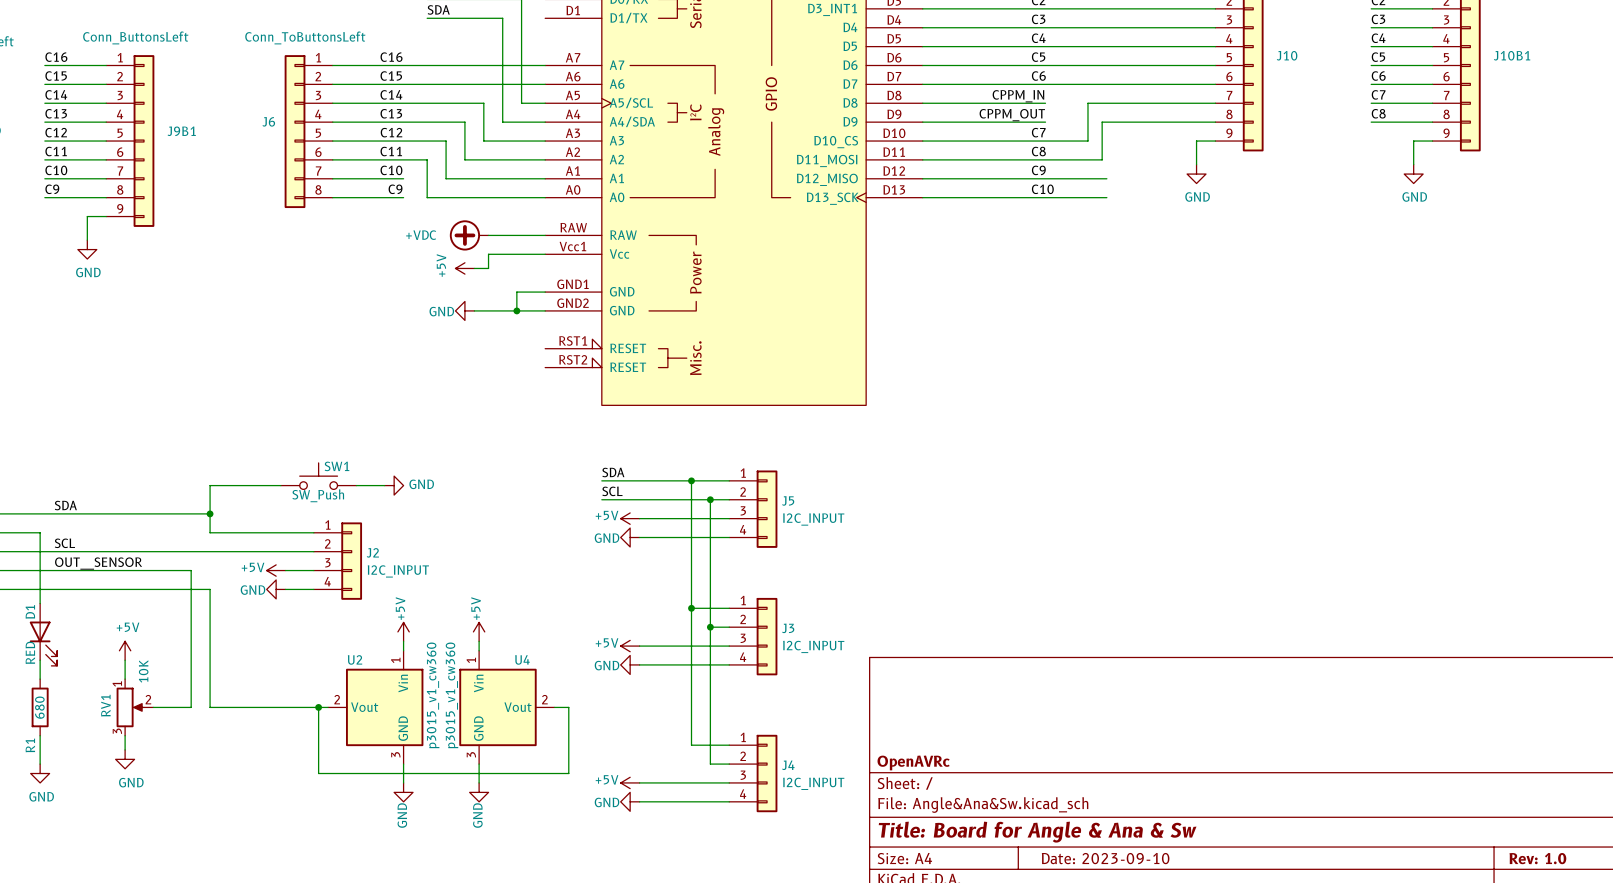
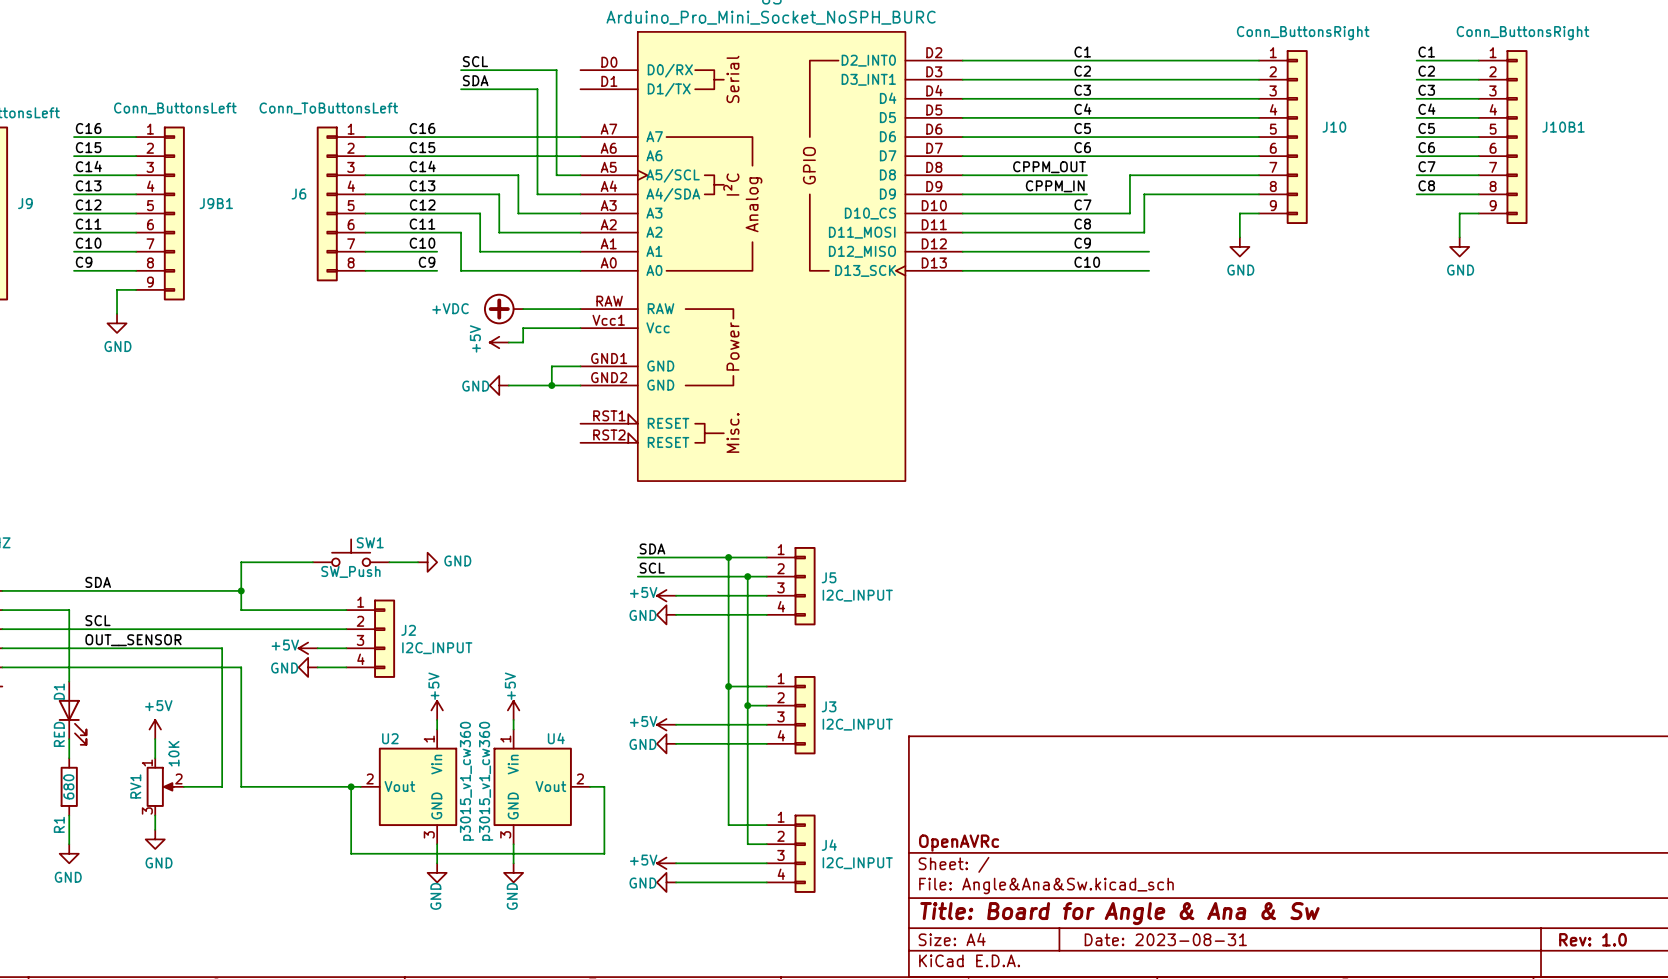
label: CPPM_IN (1018, 96) -> CPPM_OUT (1049, 167)
label: CPPM_OUT (1012, 115) -> CPPM_IN (1055, 186)
title block: Date: 2023-09-10 (1105, 858) -> Date: 2023-08-31 (1165, 939)

